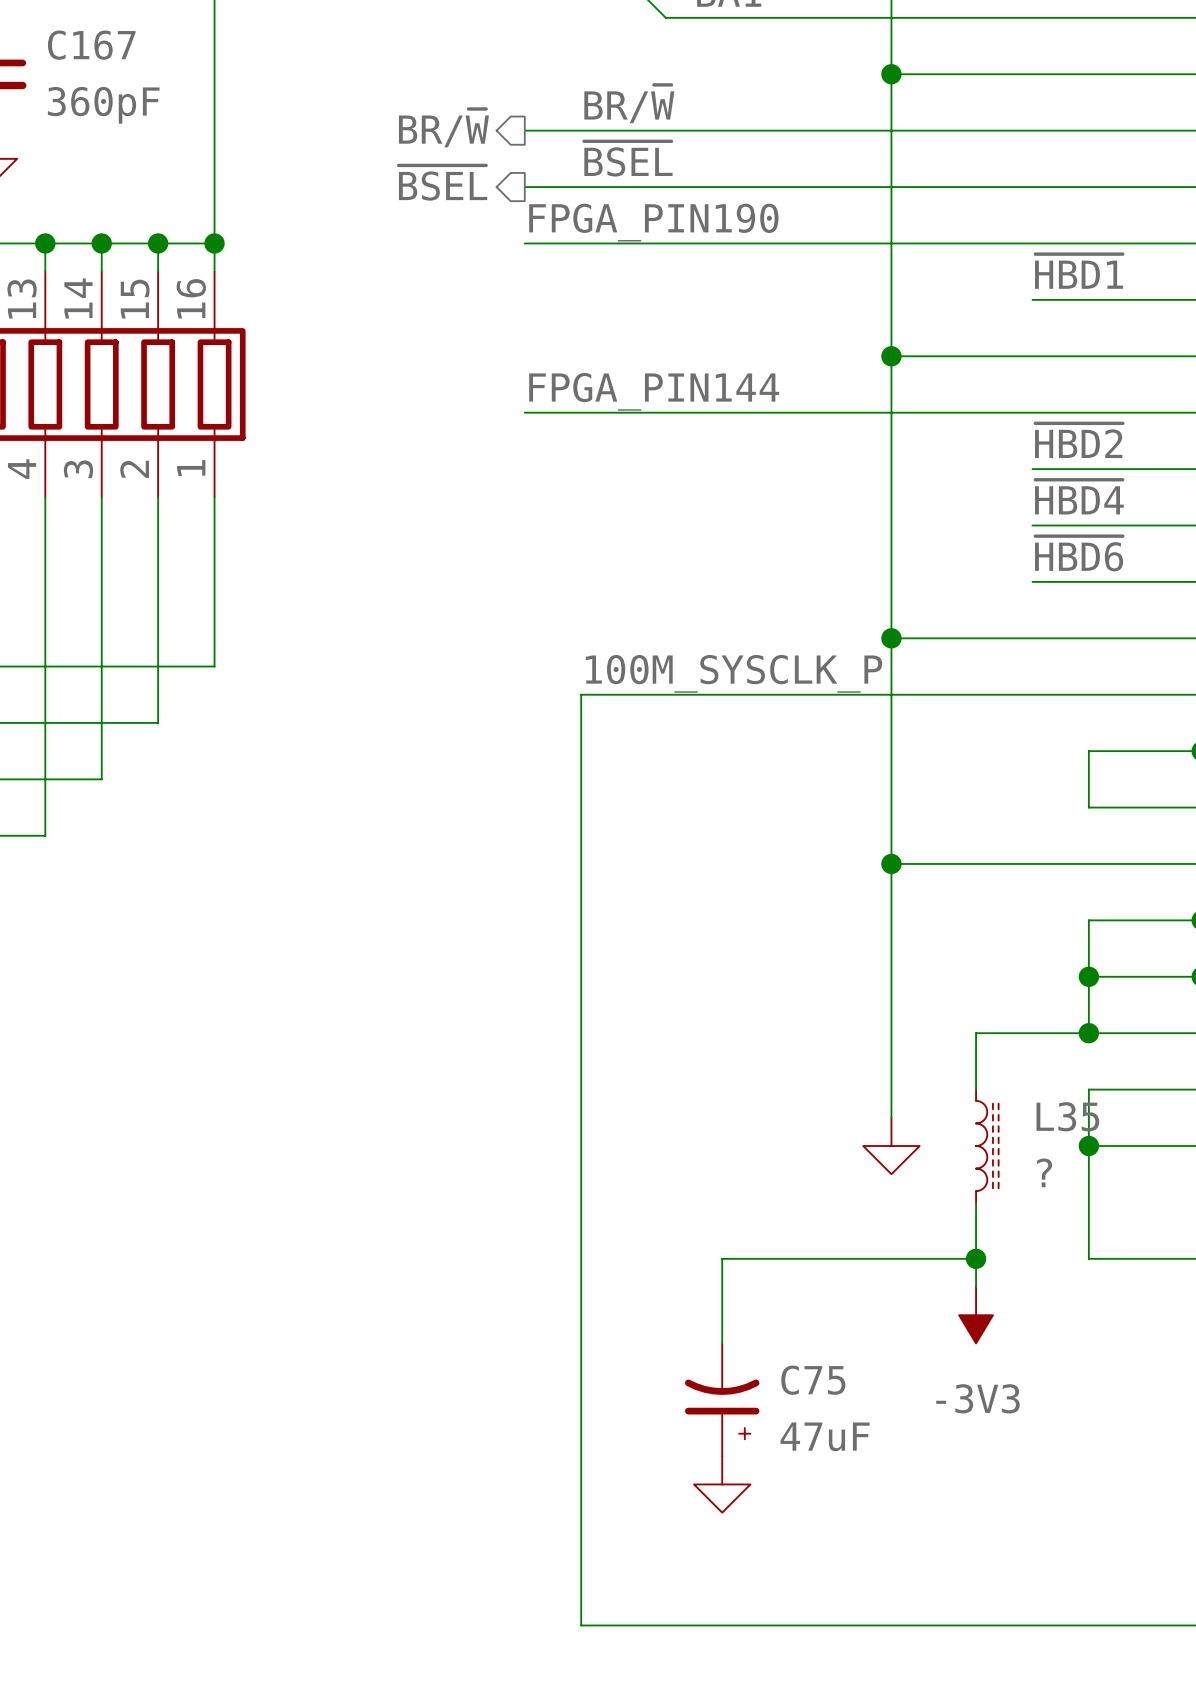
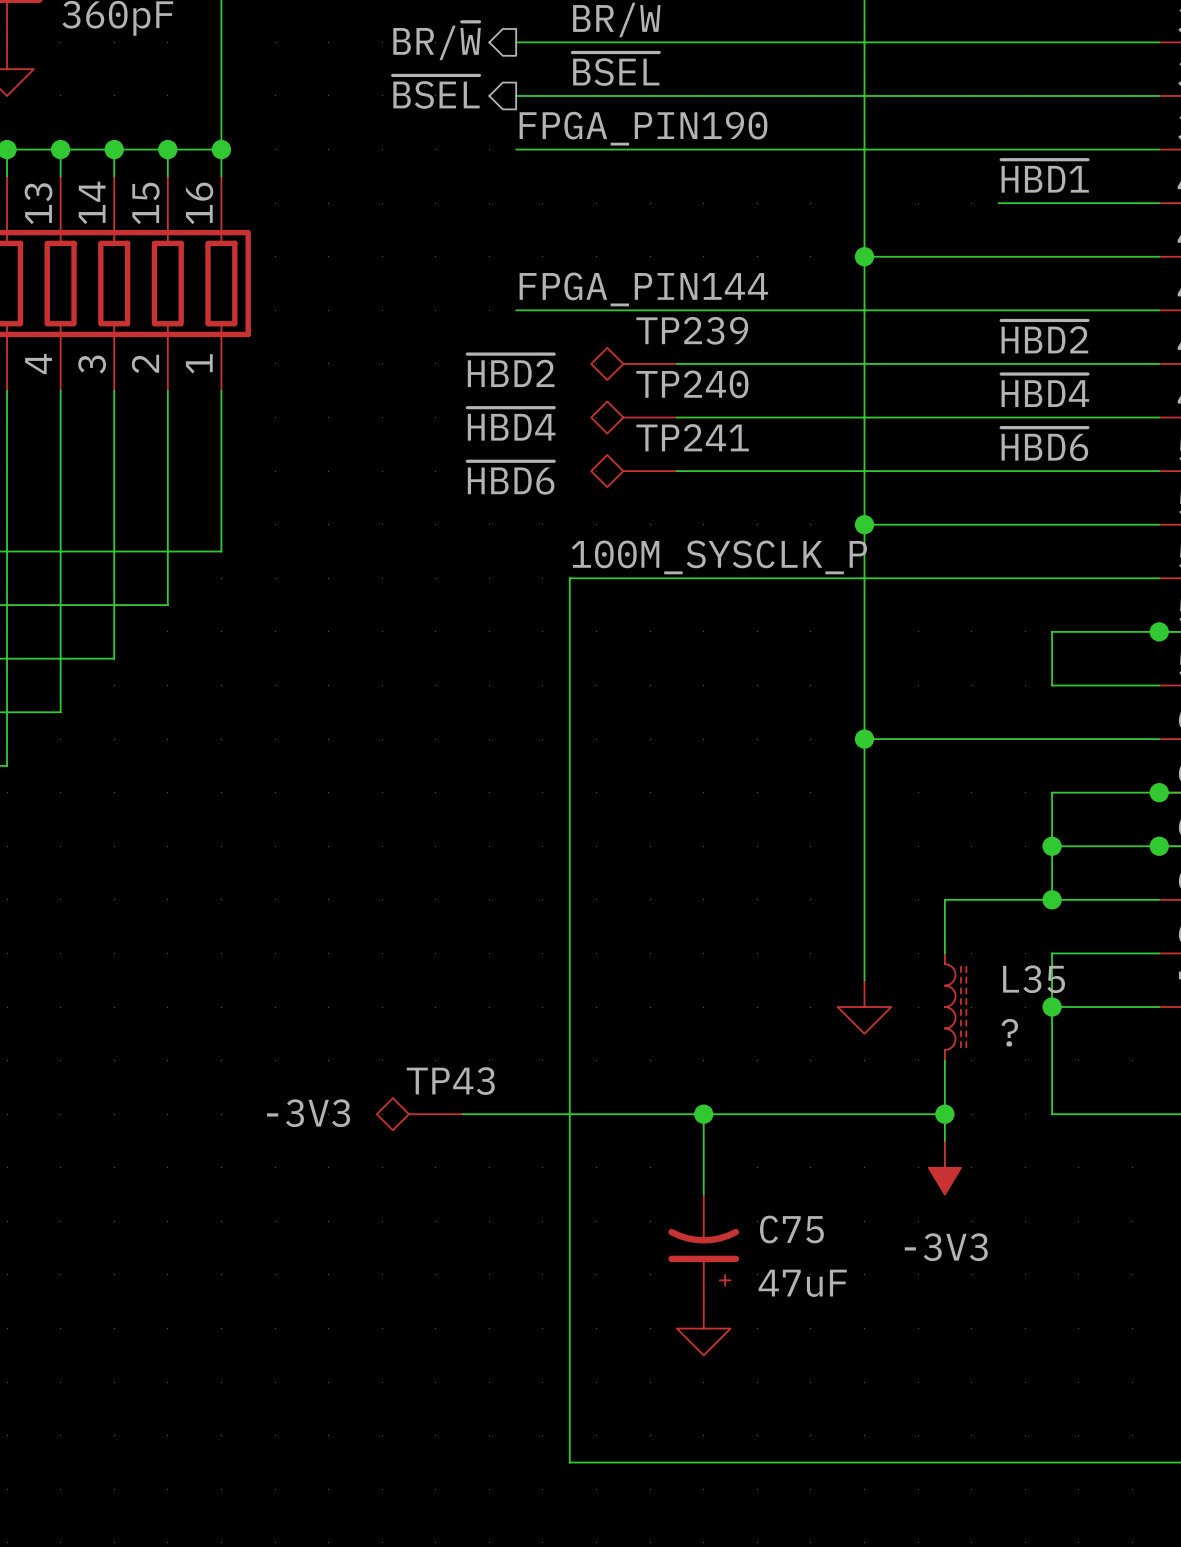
TP239: none -> ~{HBD2} (634, 363)
wire: none -> (676, 363) (998, 363)
TP240: none -> ~{HBD4} (634, 417)
wire: none -> (676, 417) (998, 417)
TP241: none -> ~{HBD6} (634, 471)
wire: none -> (676, 471) (998, 471)
TP43: none -> -3V3 (419, 1114)
wire: none -> (462, 1114) (703, 1114)
junction: none -> (703, 1114)

